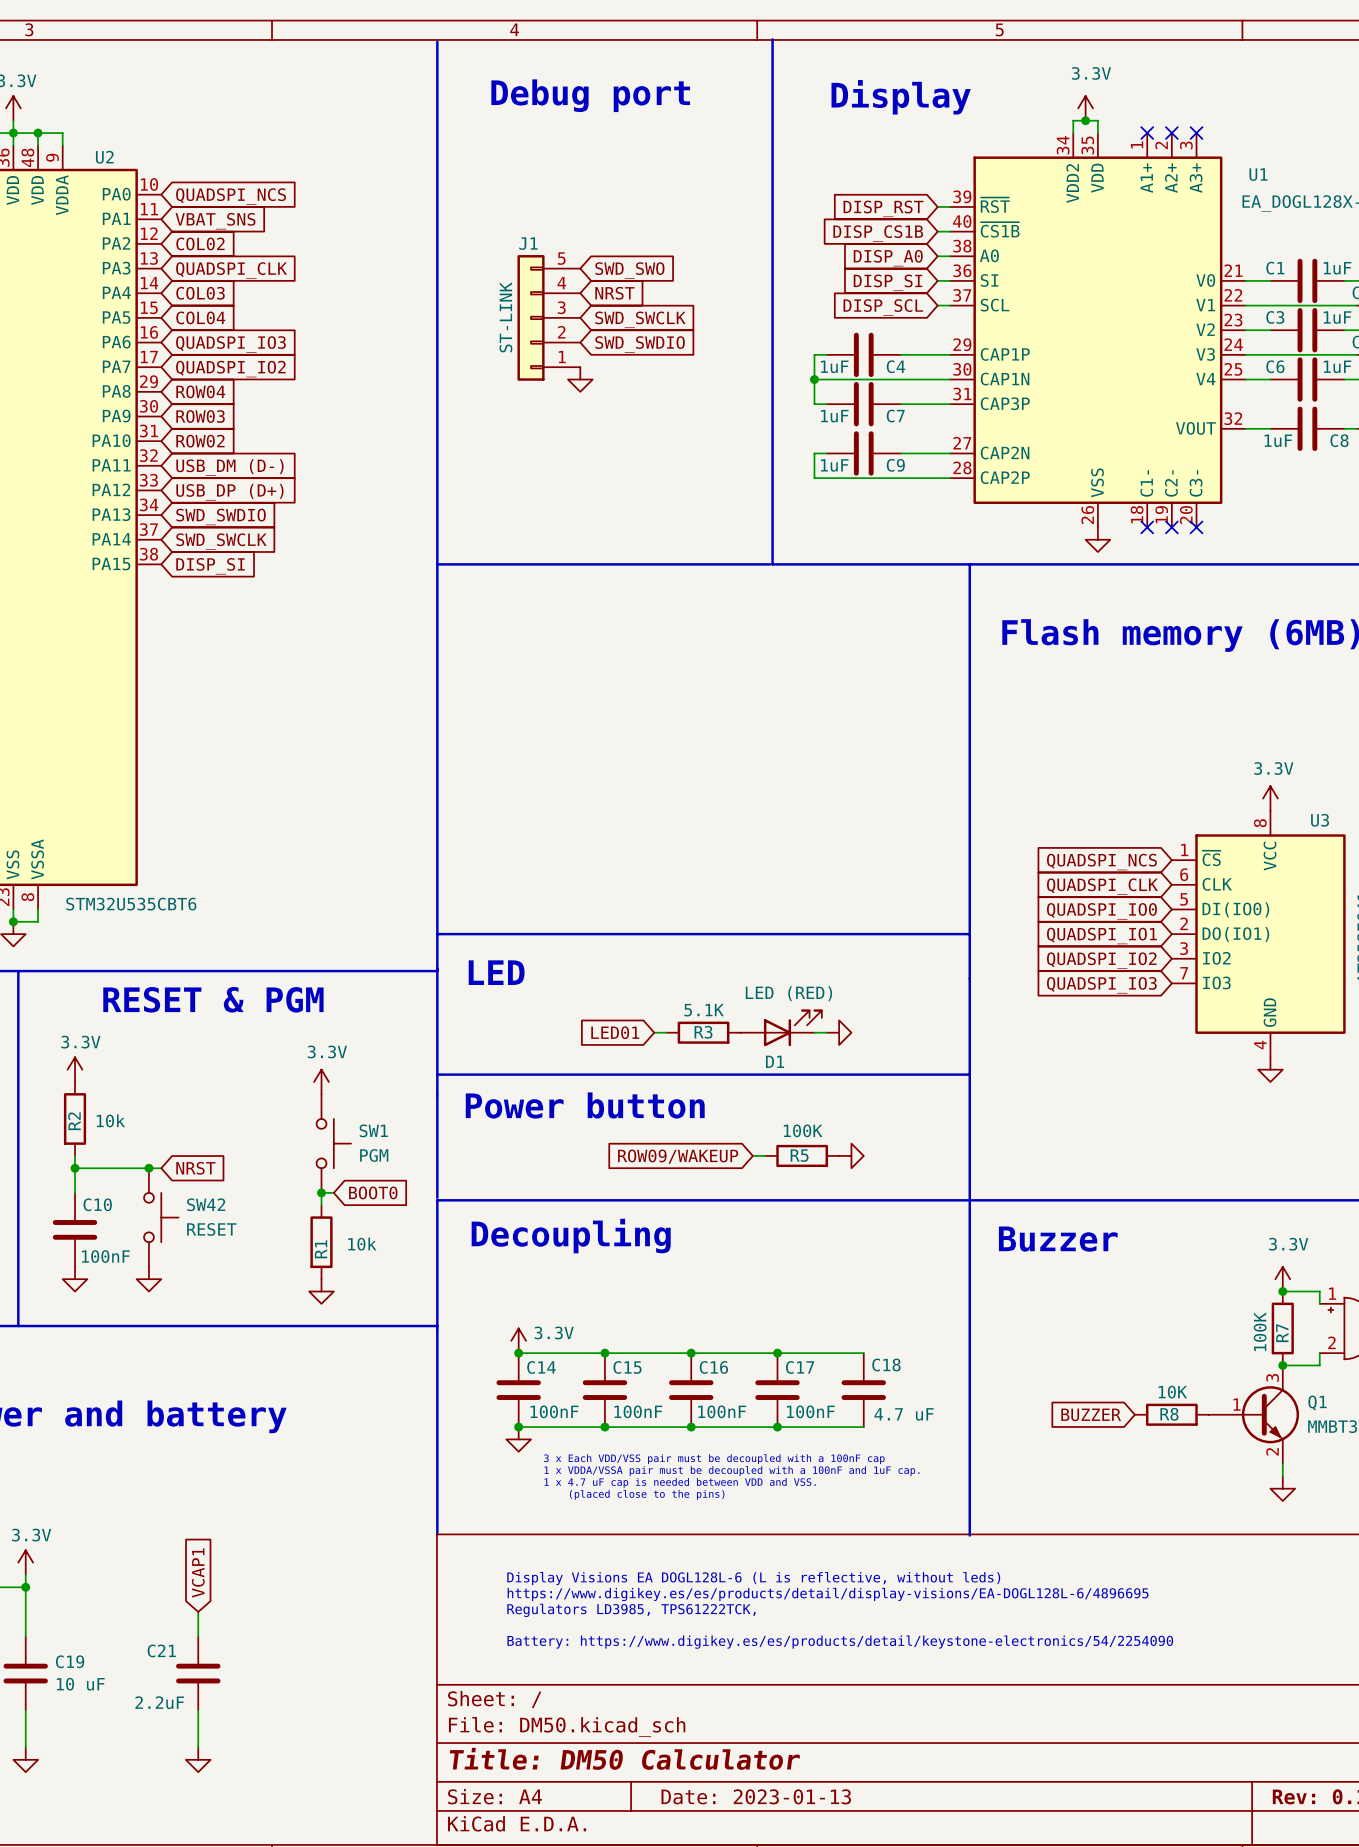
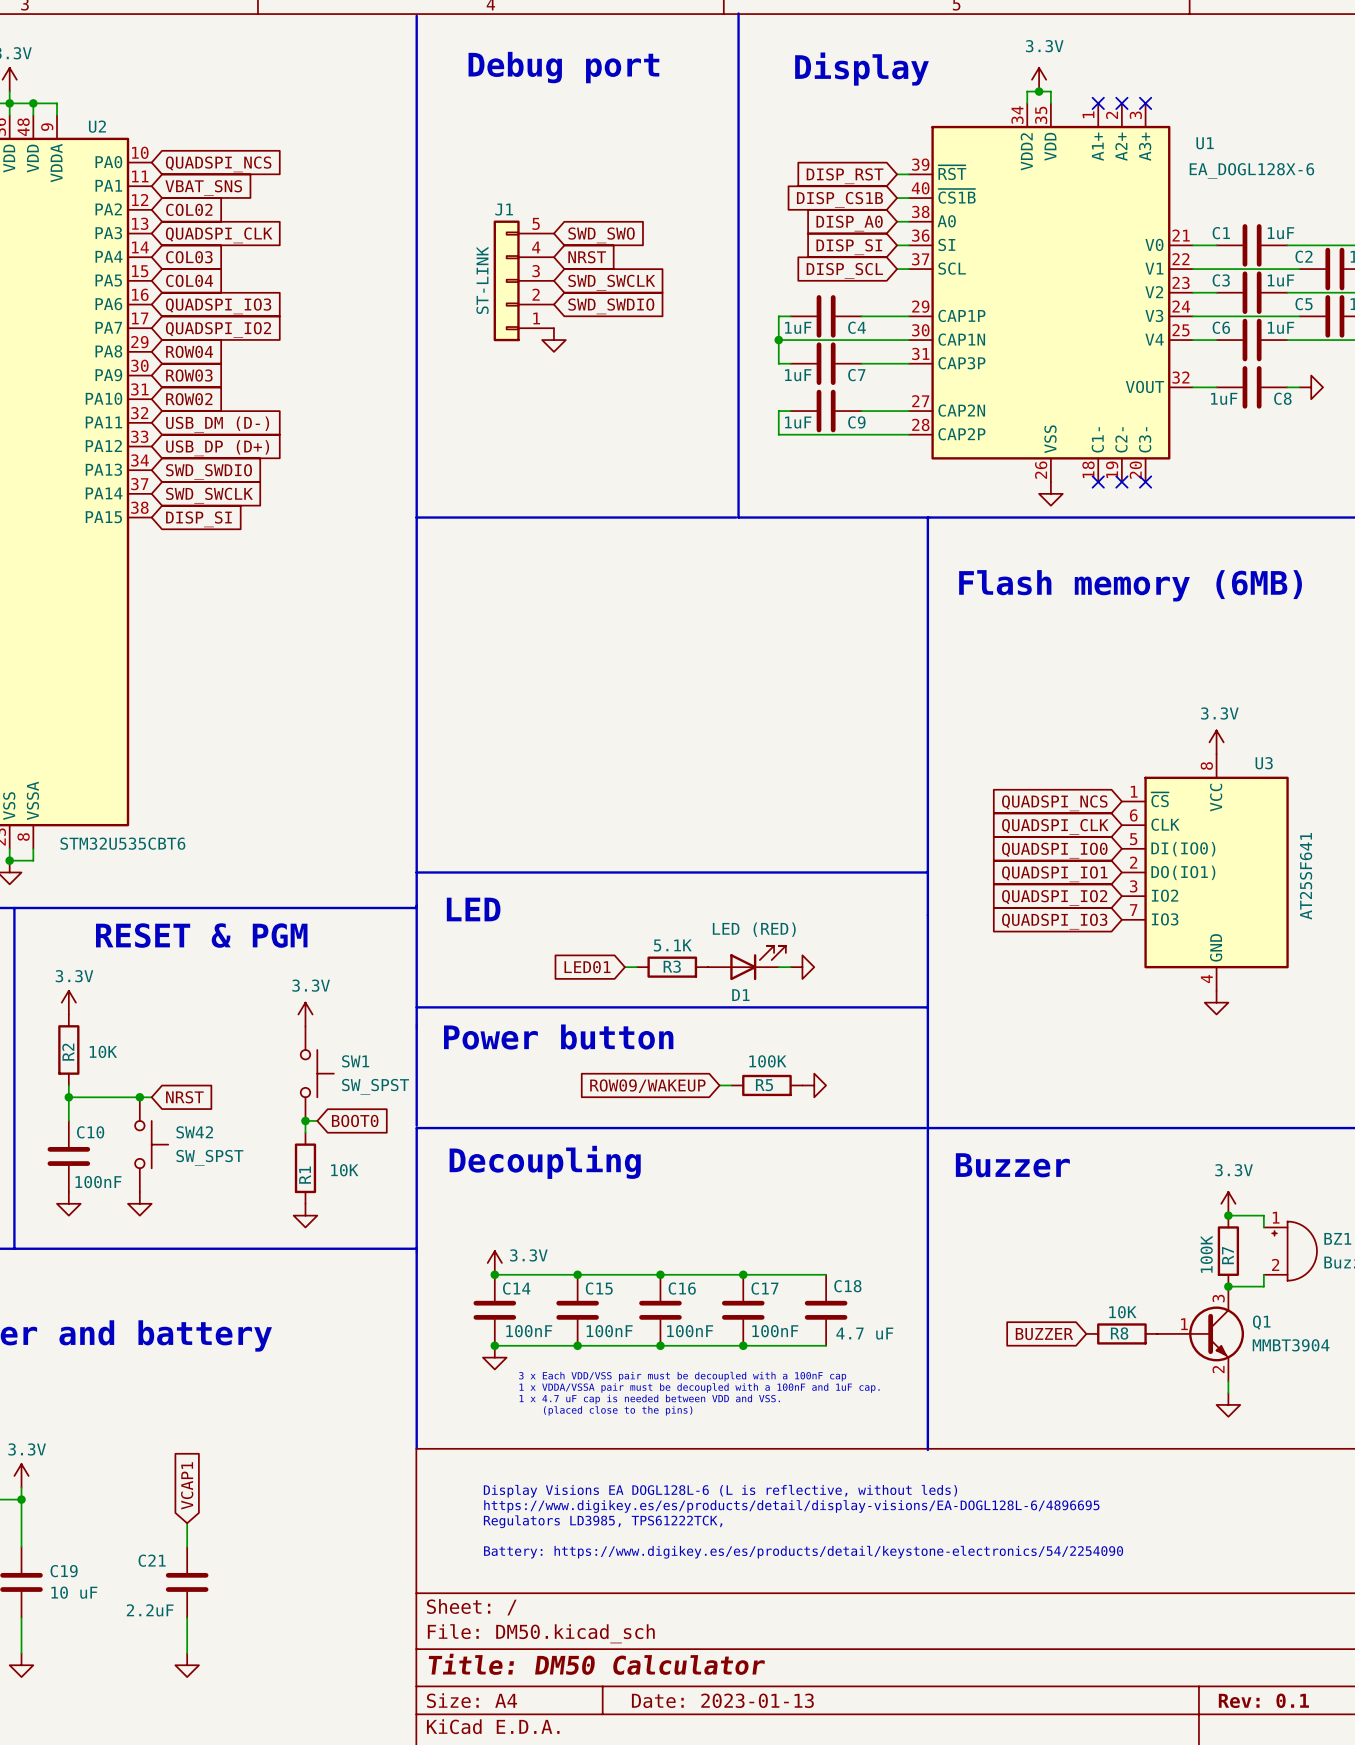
R2 value: 10k (110, 1120) -> 10K (103, 1051)
SW1 value: PGM (374, 1155) -> SW_SPST (375, 1086)
SW42 value: RESET (211, 1229) -> SW_SPST (209, 1157)
R1 value: 10k (362, 1244) -> 10K (344, 1170)

